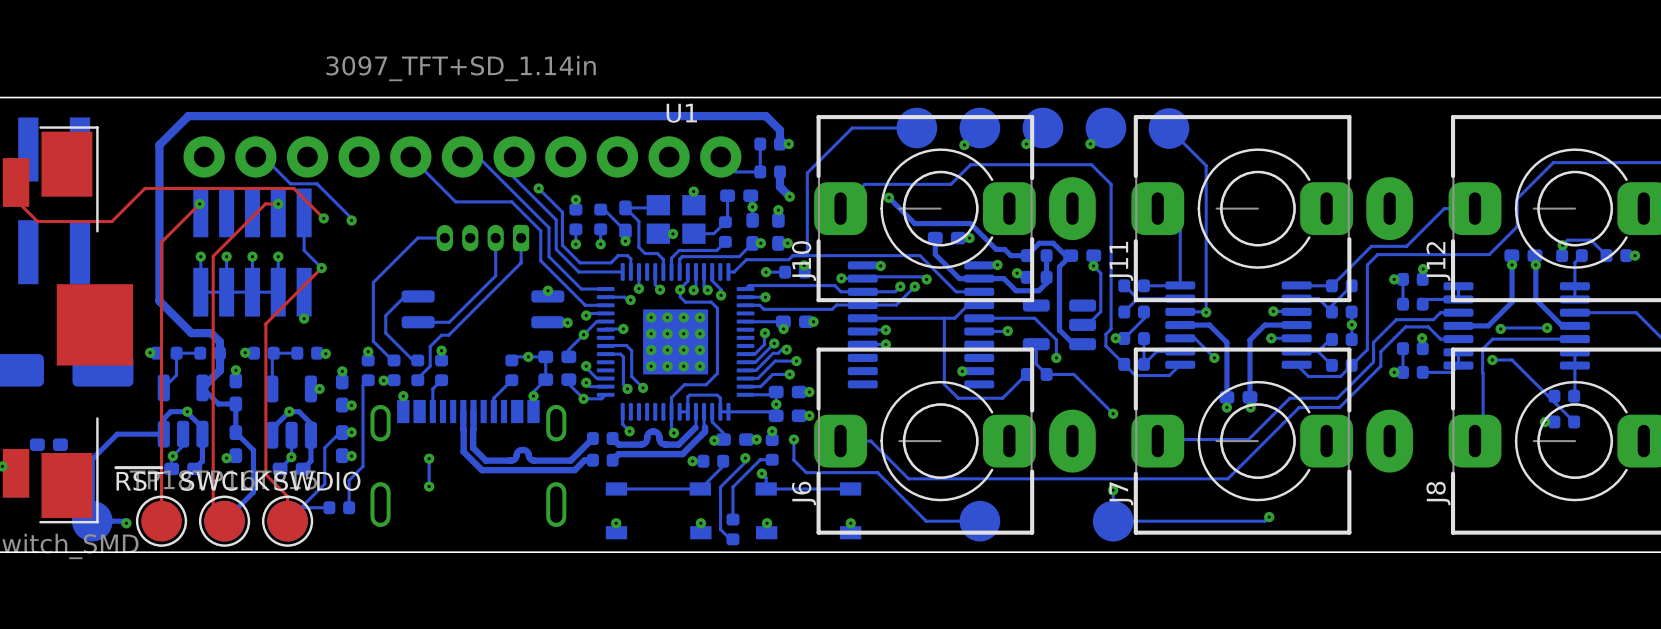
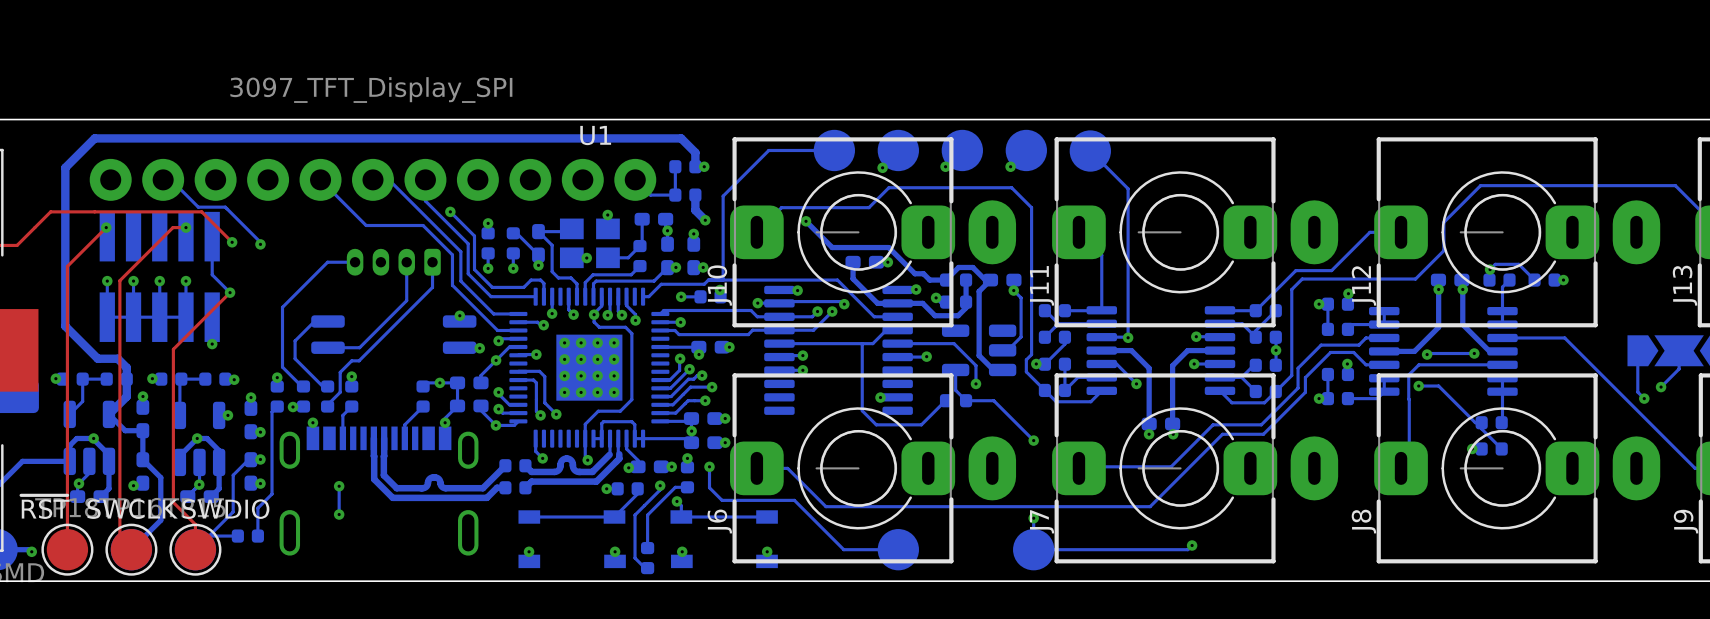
U1 value: 3097_TFT+SD_1.14in (461, 68) -> 3097_TFT_Display_SPI (371, 90)

